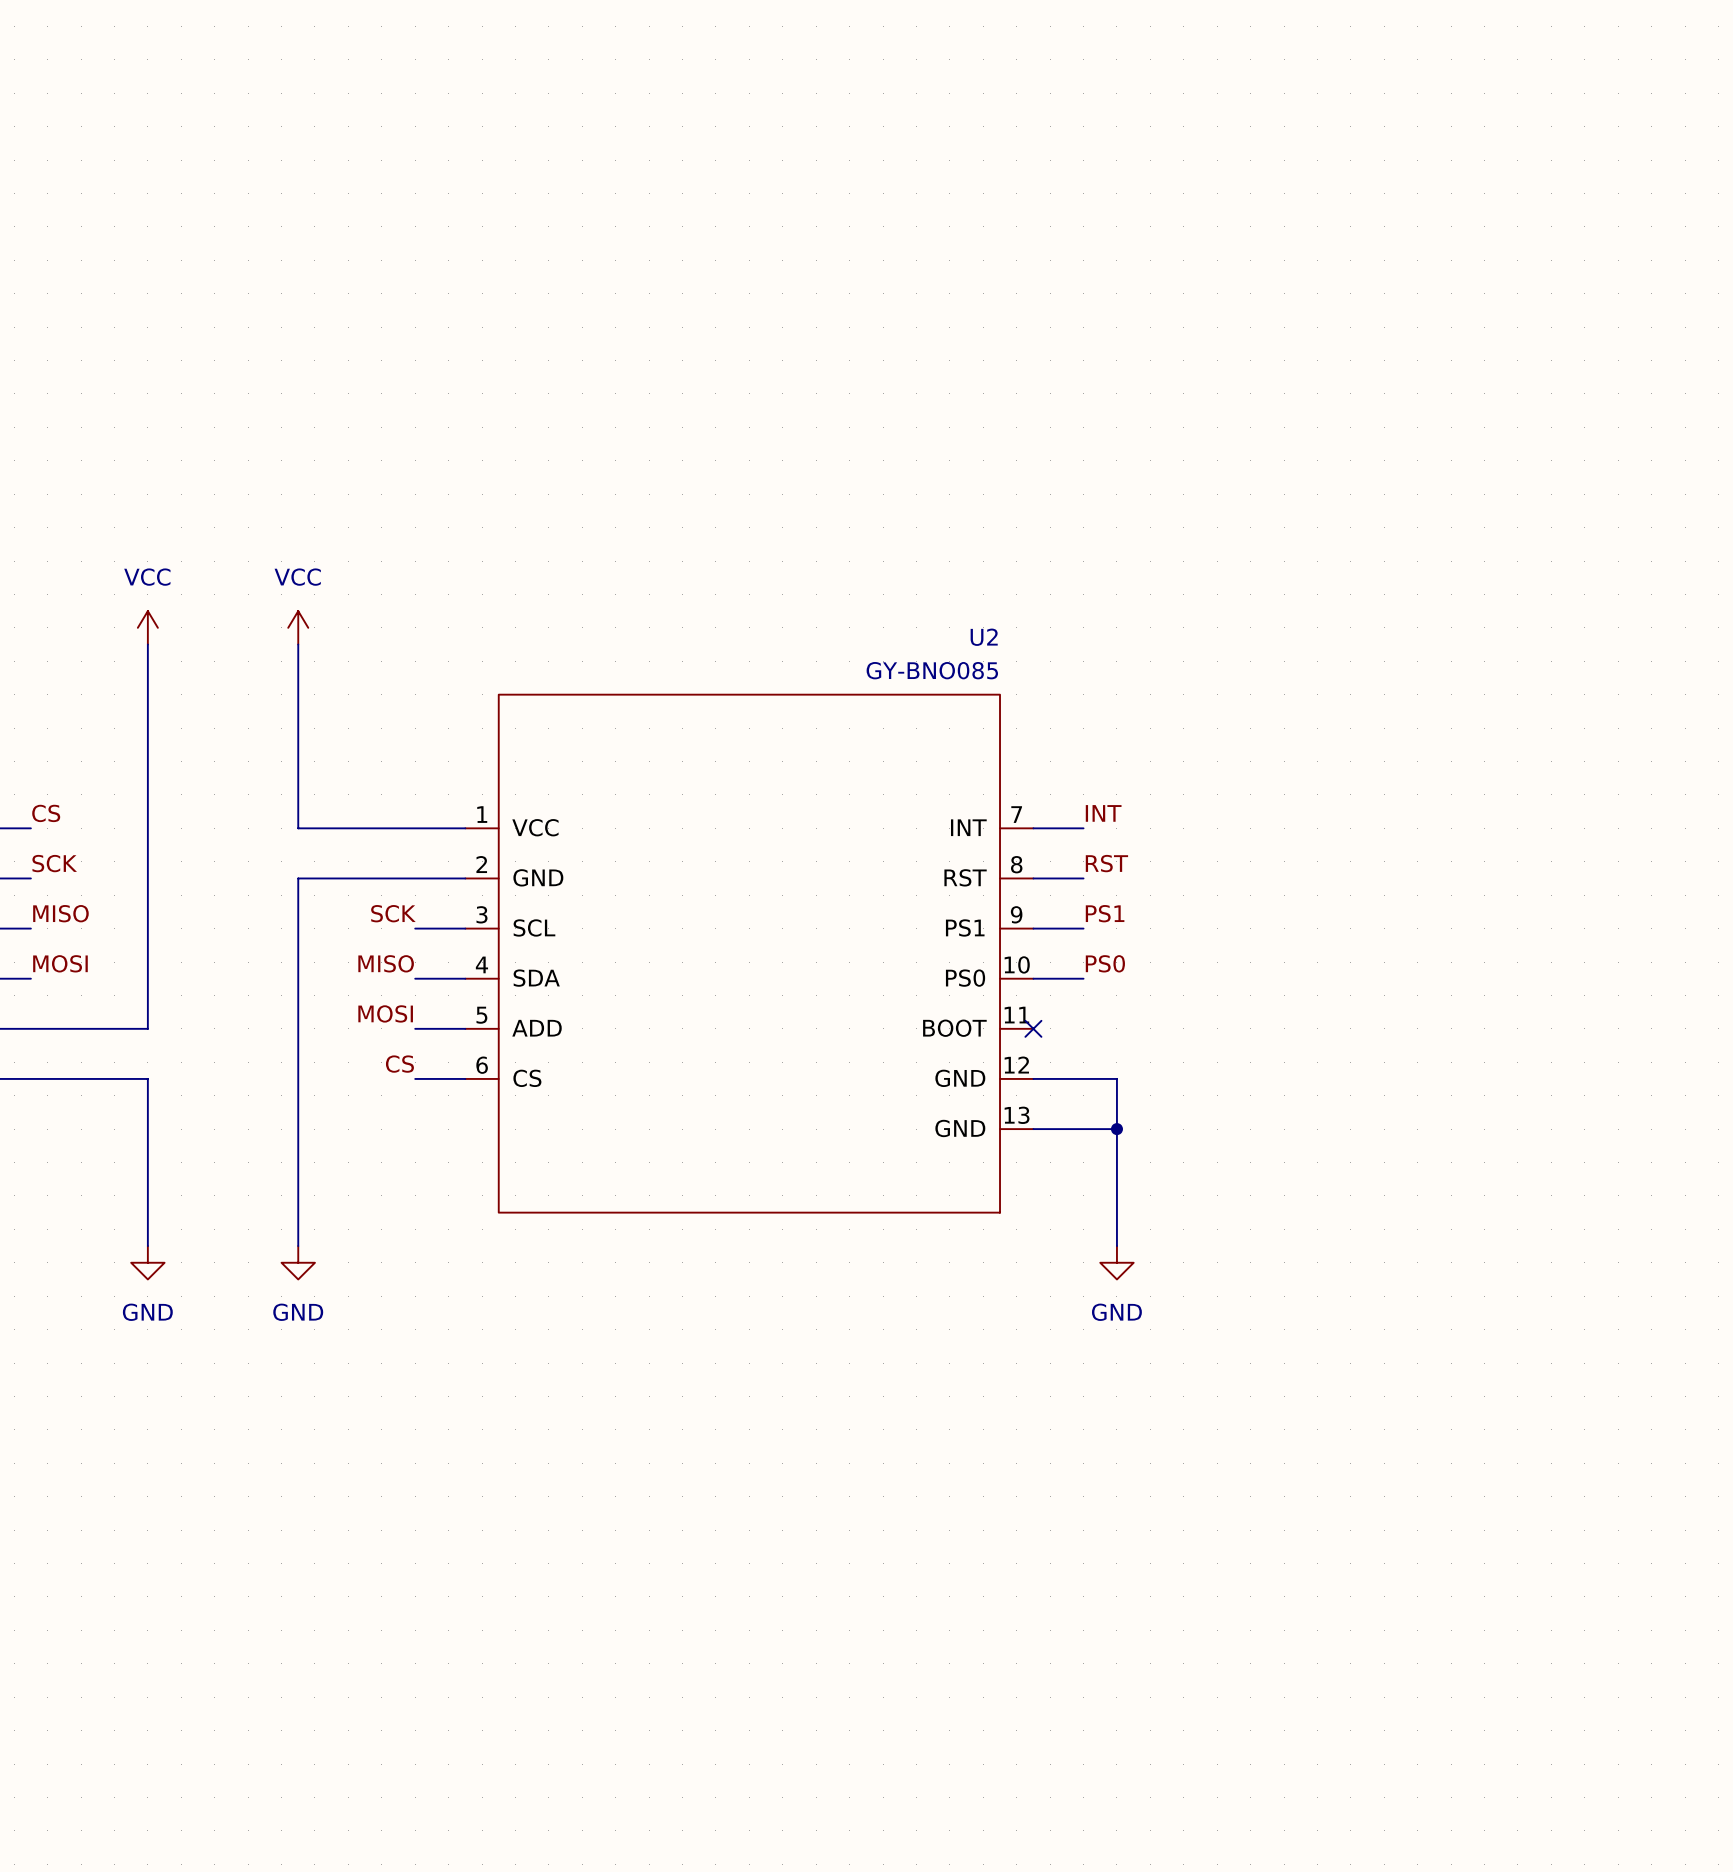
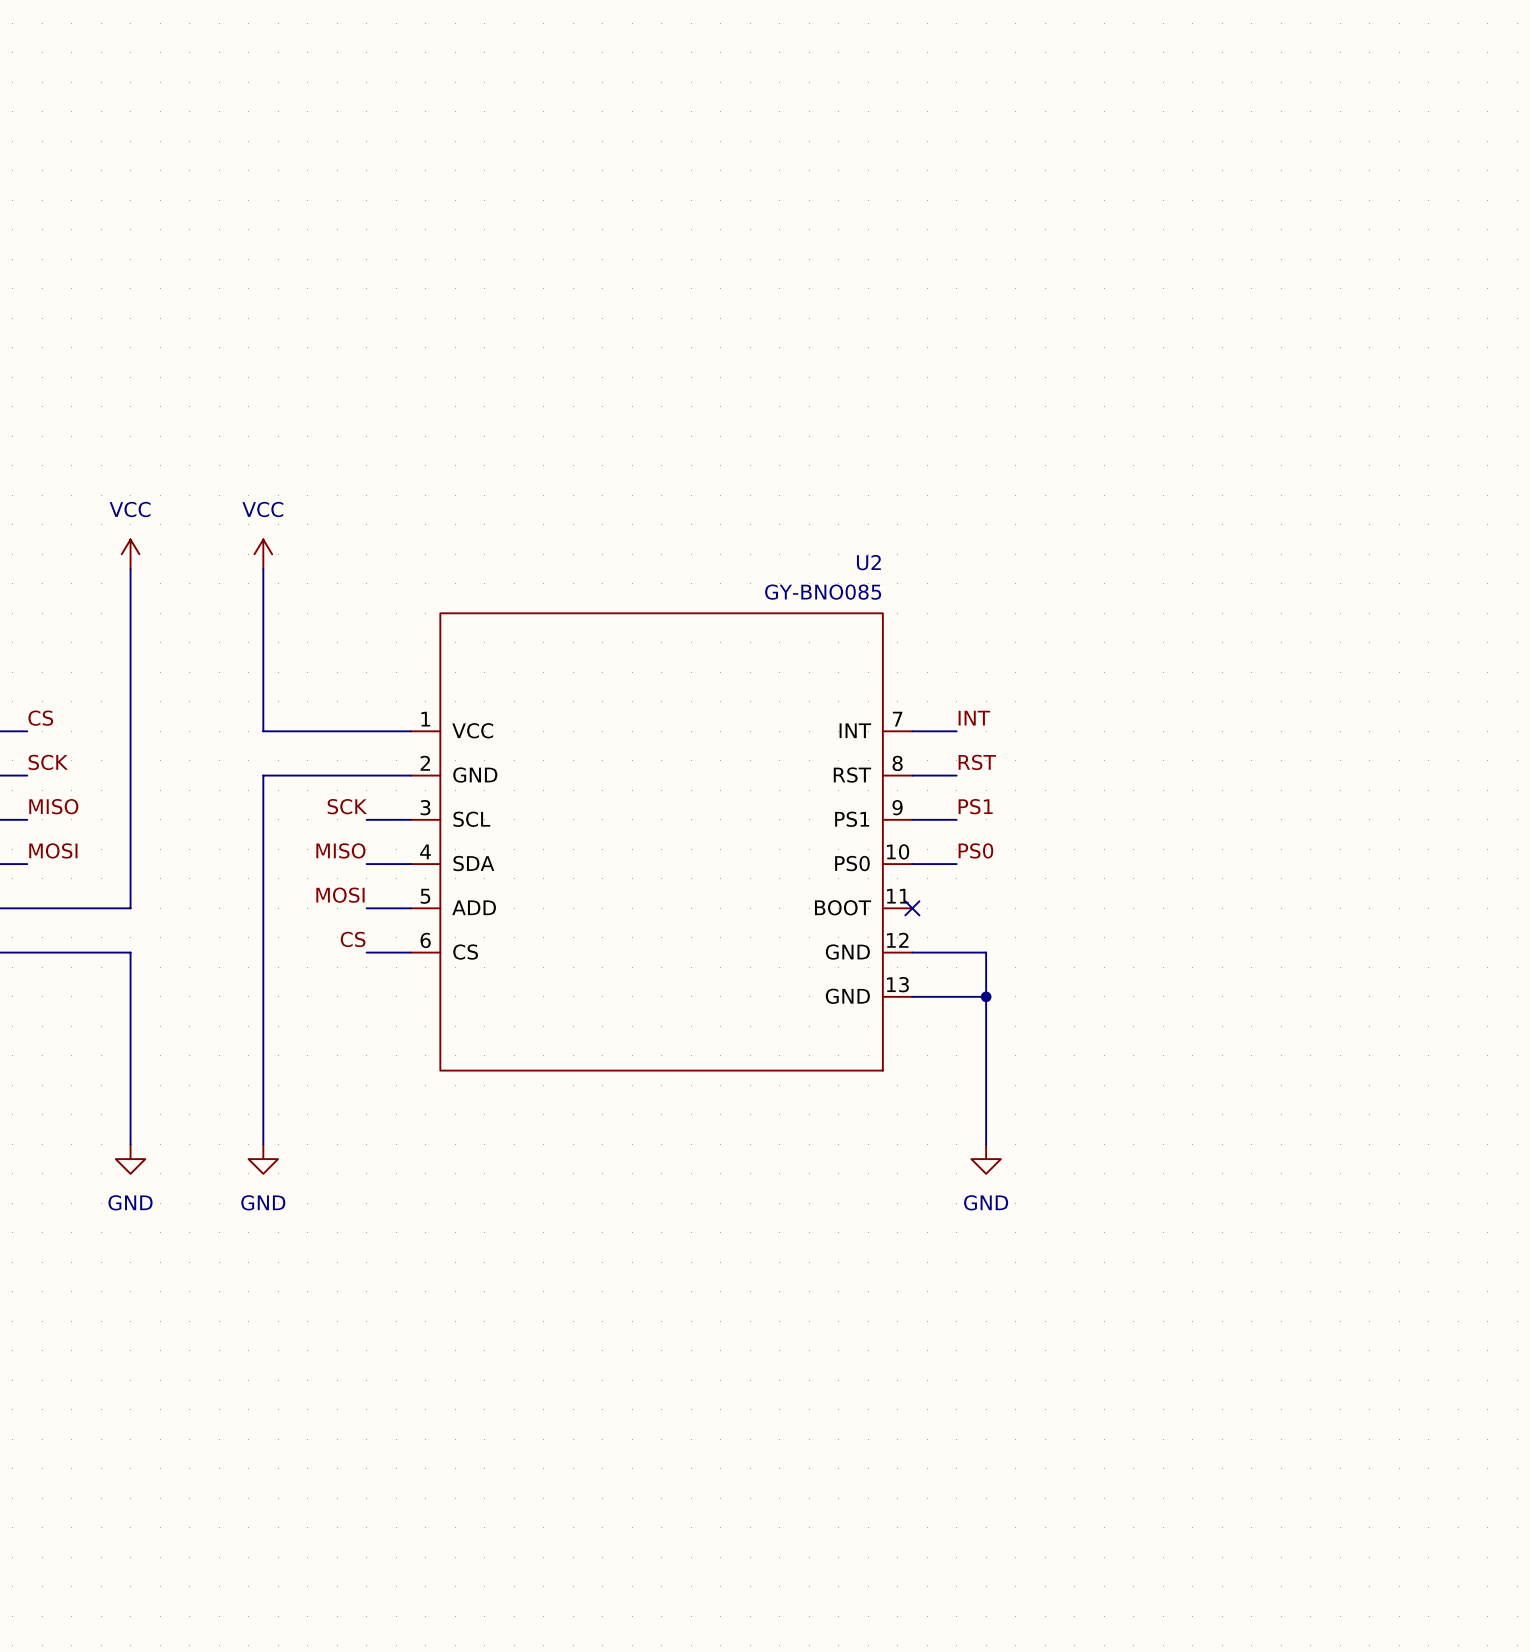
wire: none -> (130, 1100) (130, 1144)
wire: none -> (263, 1100) (263, 1144)
wire: none -> (986, 1100) (986, 1144)
power symbol position: GND (147, 1262) -> GND (130, 1159)
power symbol position: GND (298, 1262) -> GND (263, 1159)
power symbol position: GND (1116, 1262) -> GND (986, 1159)

